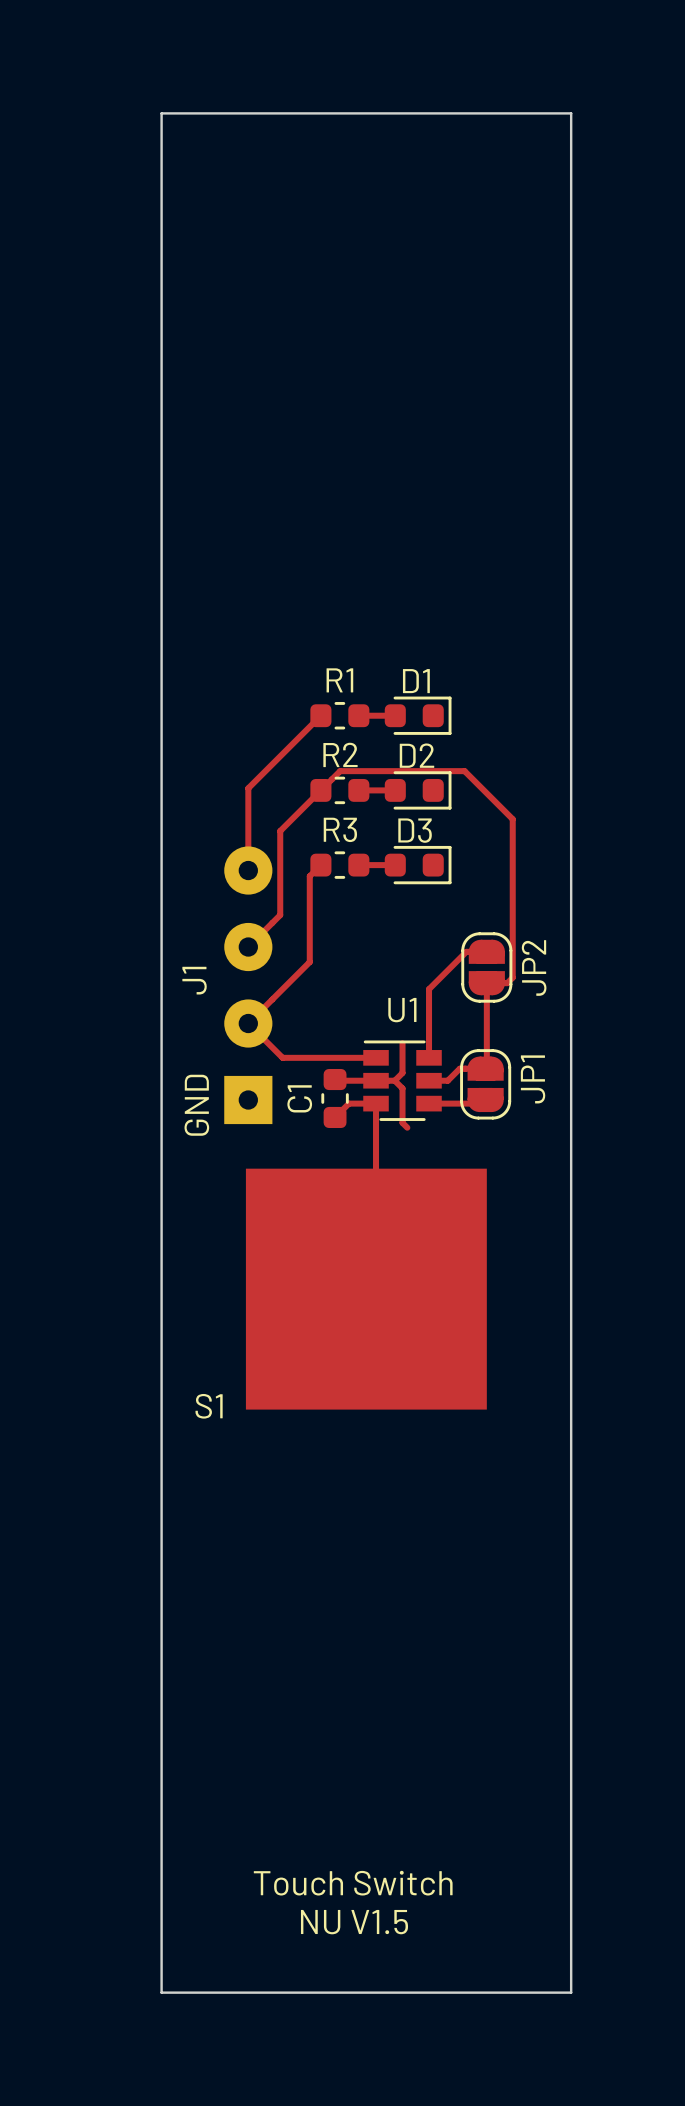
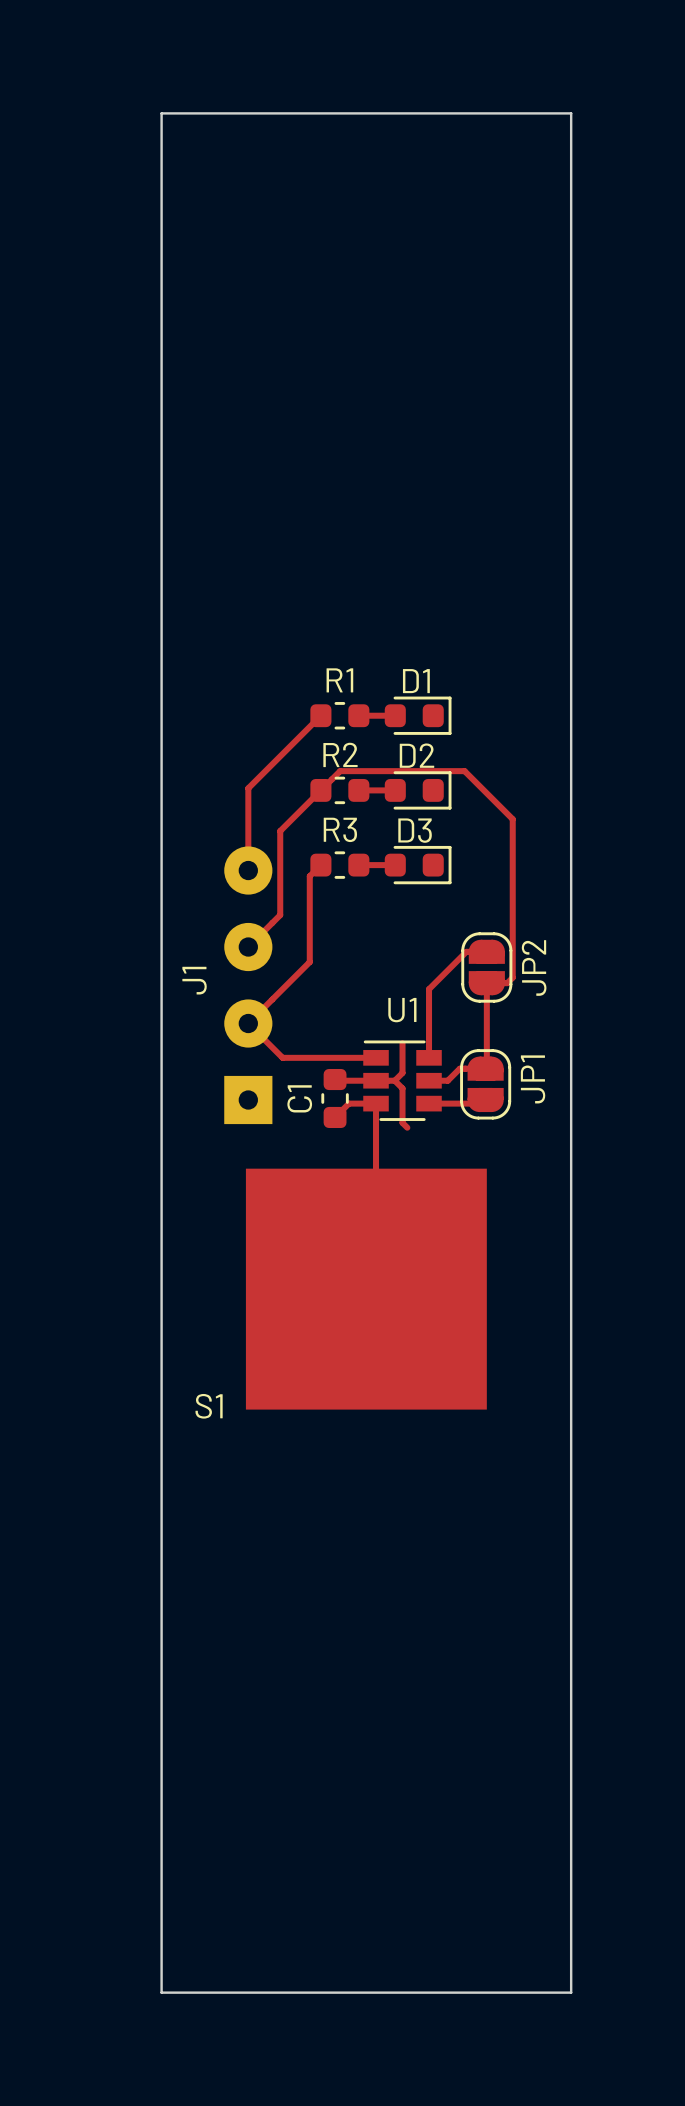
text: GND (196, 1105) -> none
text: Touch Switch (353, 1883) -> none
text: NU V1.5 (354, 1922) -> none

